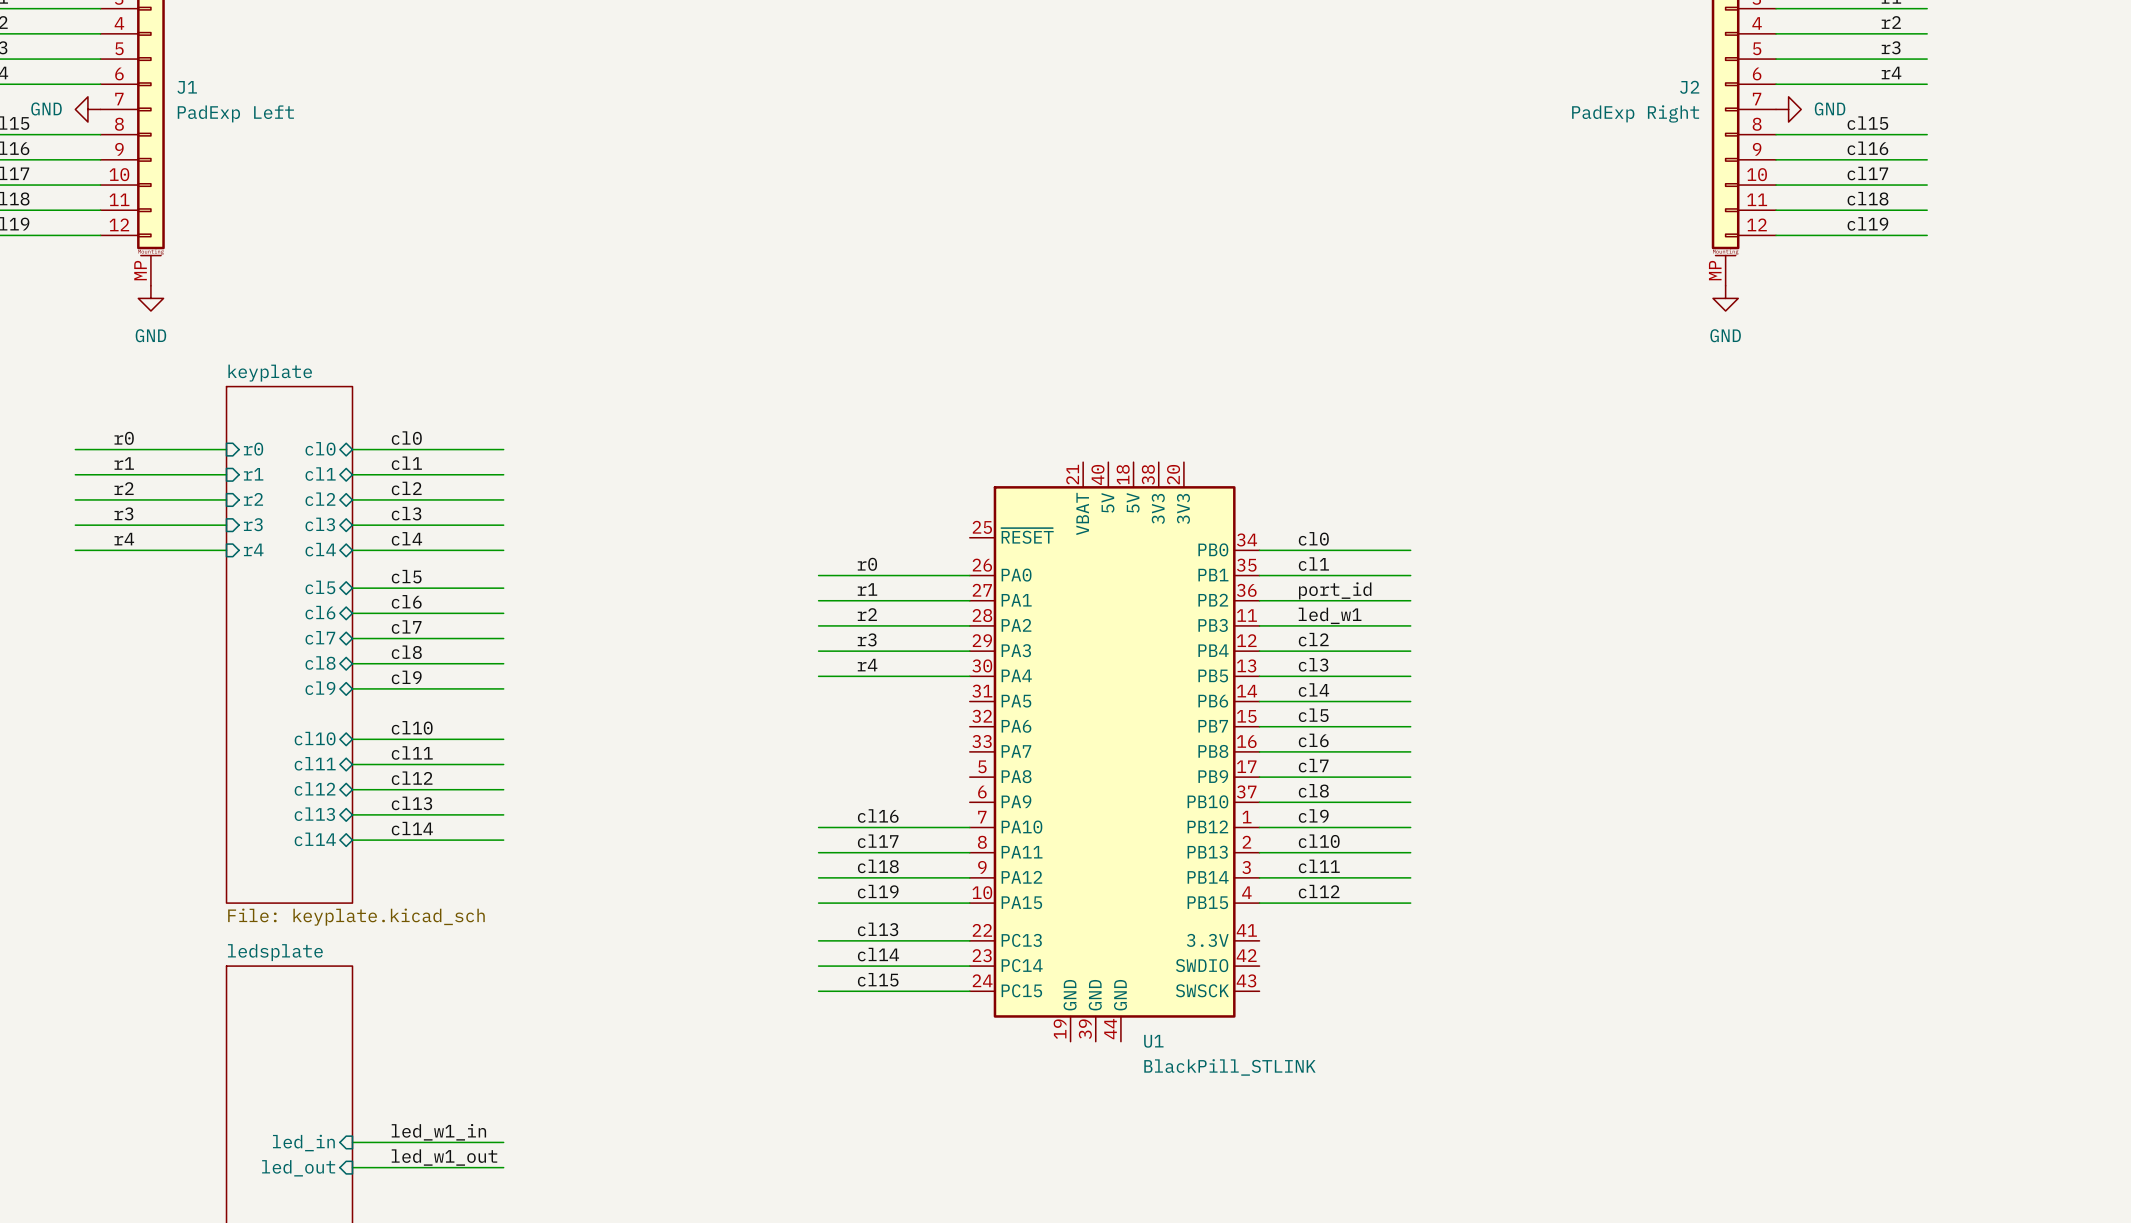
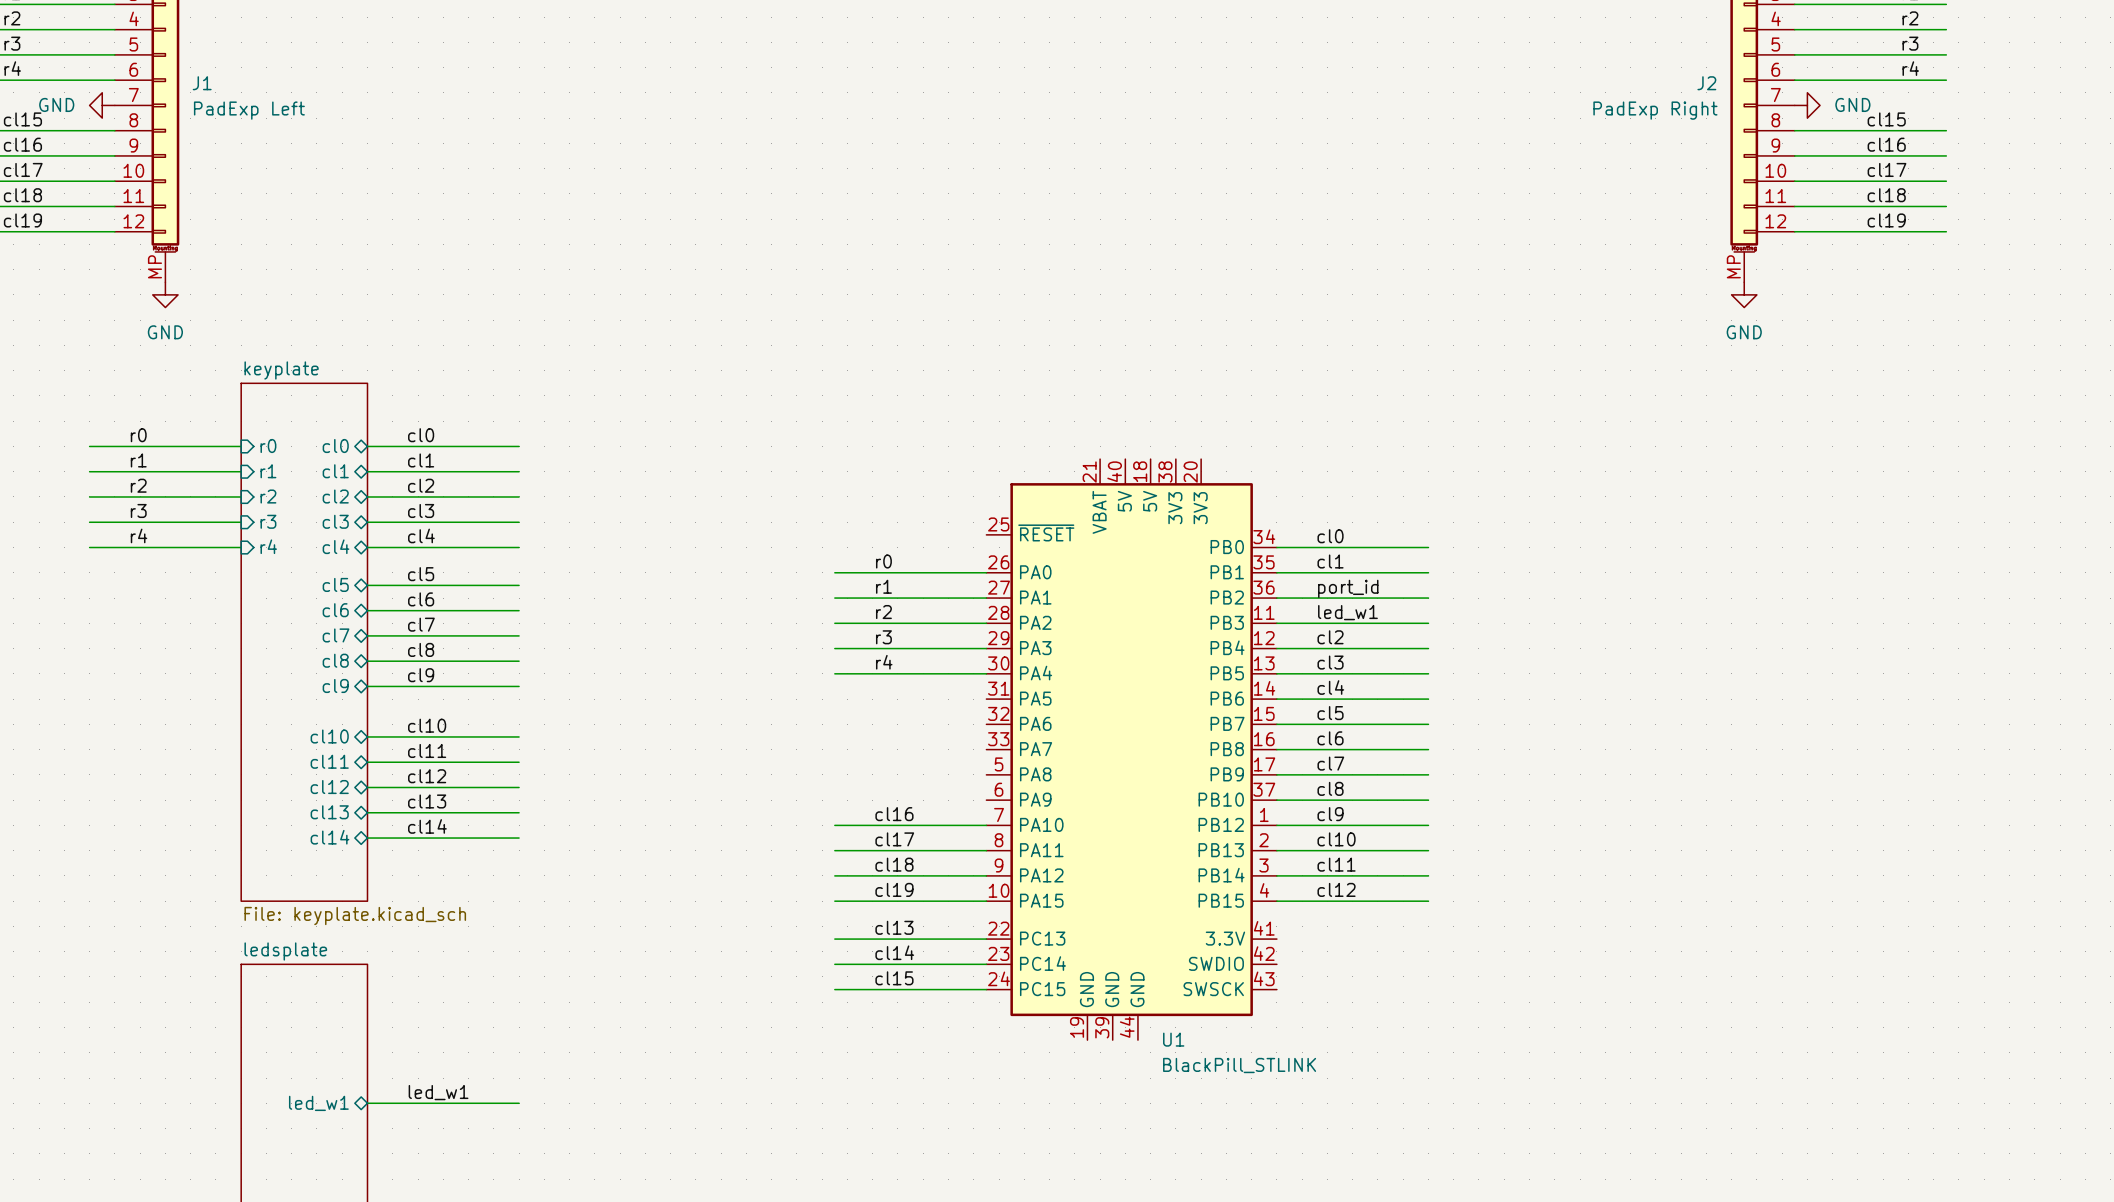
label: none -> led_w1 (438, 1092)
sheet pin: none -> led_w1 (318, 1103)
label: led_w1_in (438, 1132) -> none
wire: (352, 1142) (503, 1142) -> (367, 1103) (519, 1103)
sheet pin: led_in (303, 1143) -> none
label: led_w1_out (444, 1157) -> none
wire: (352, 1167) (503, 1167) -> none
sheet pin: led_out (298, 1168) -> none

